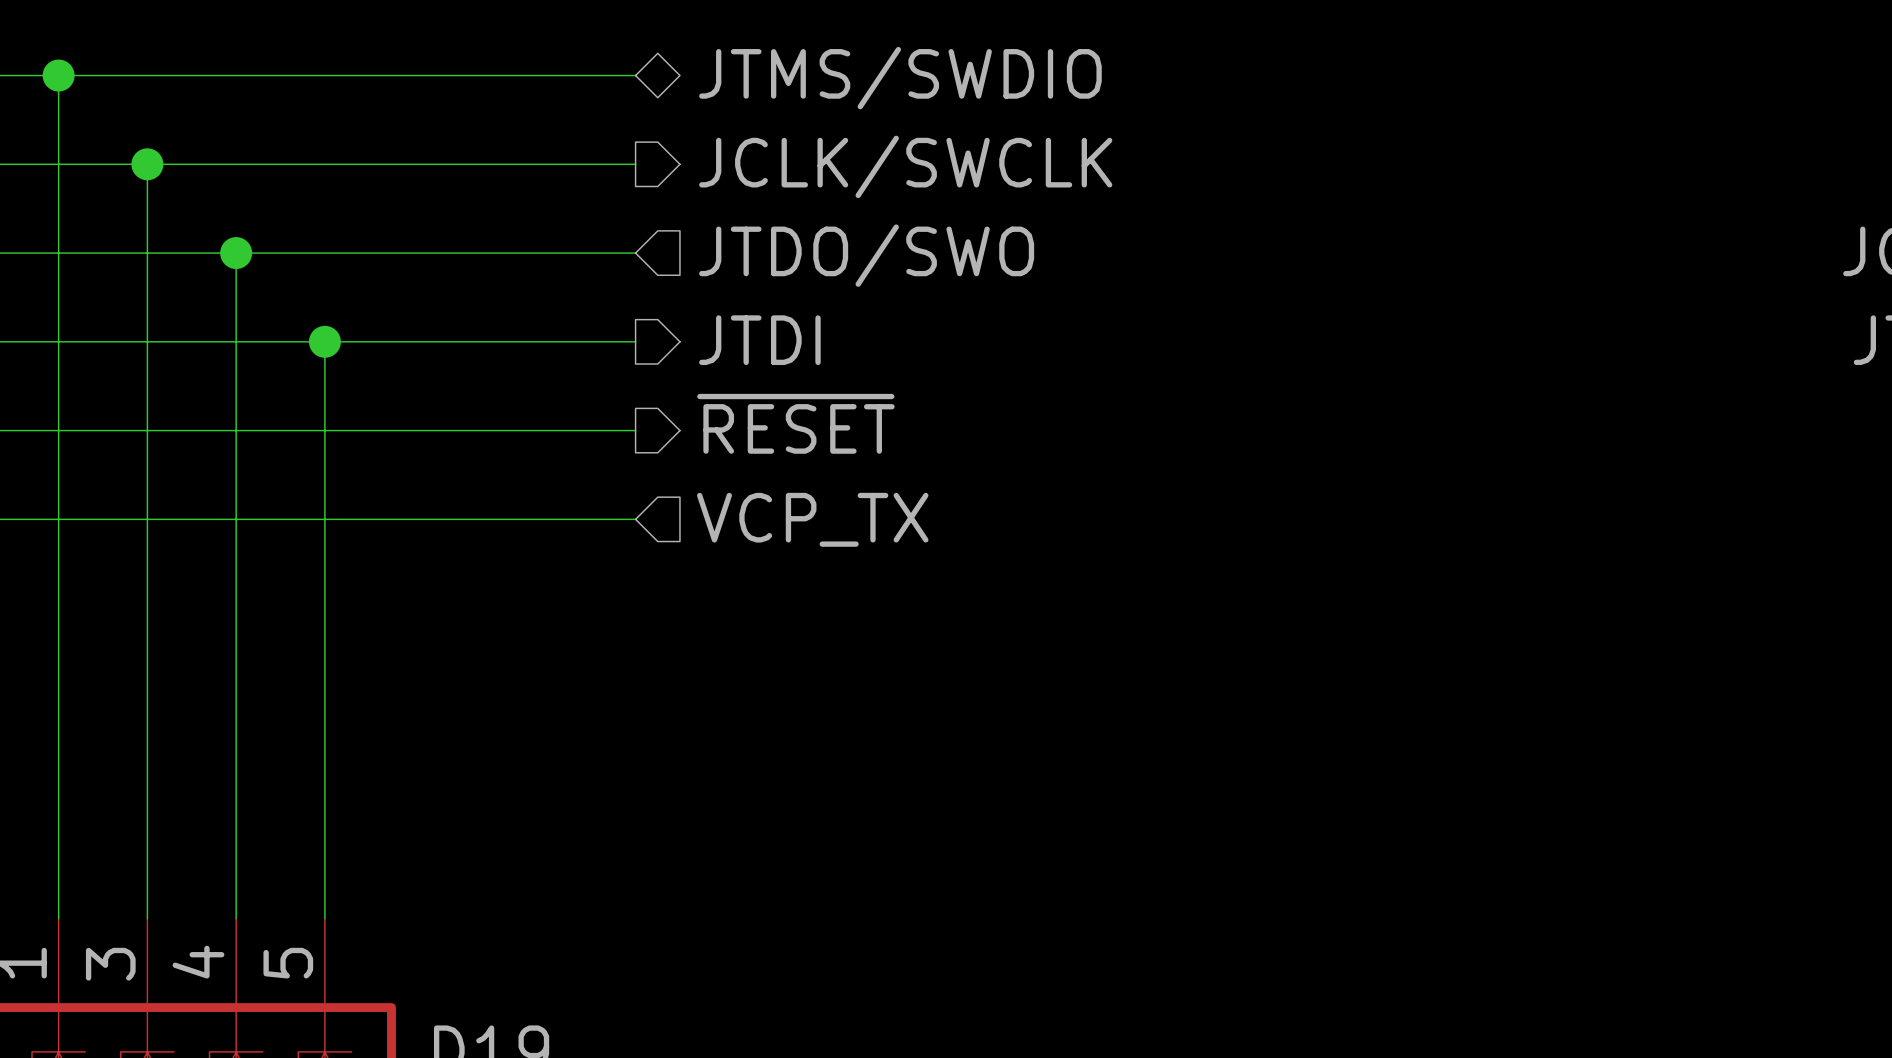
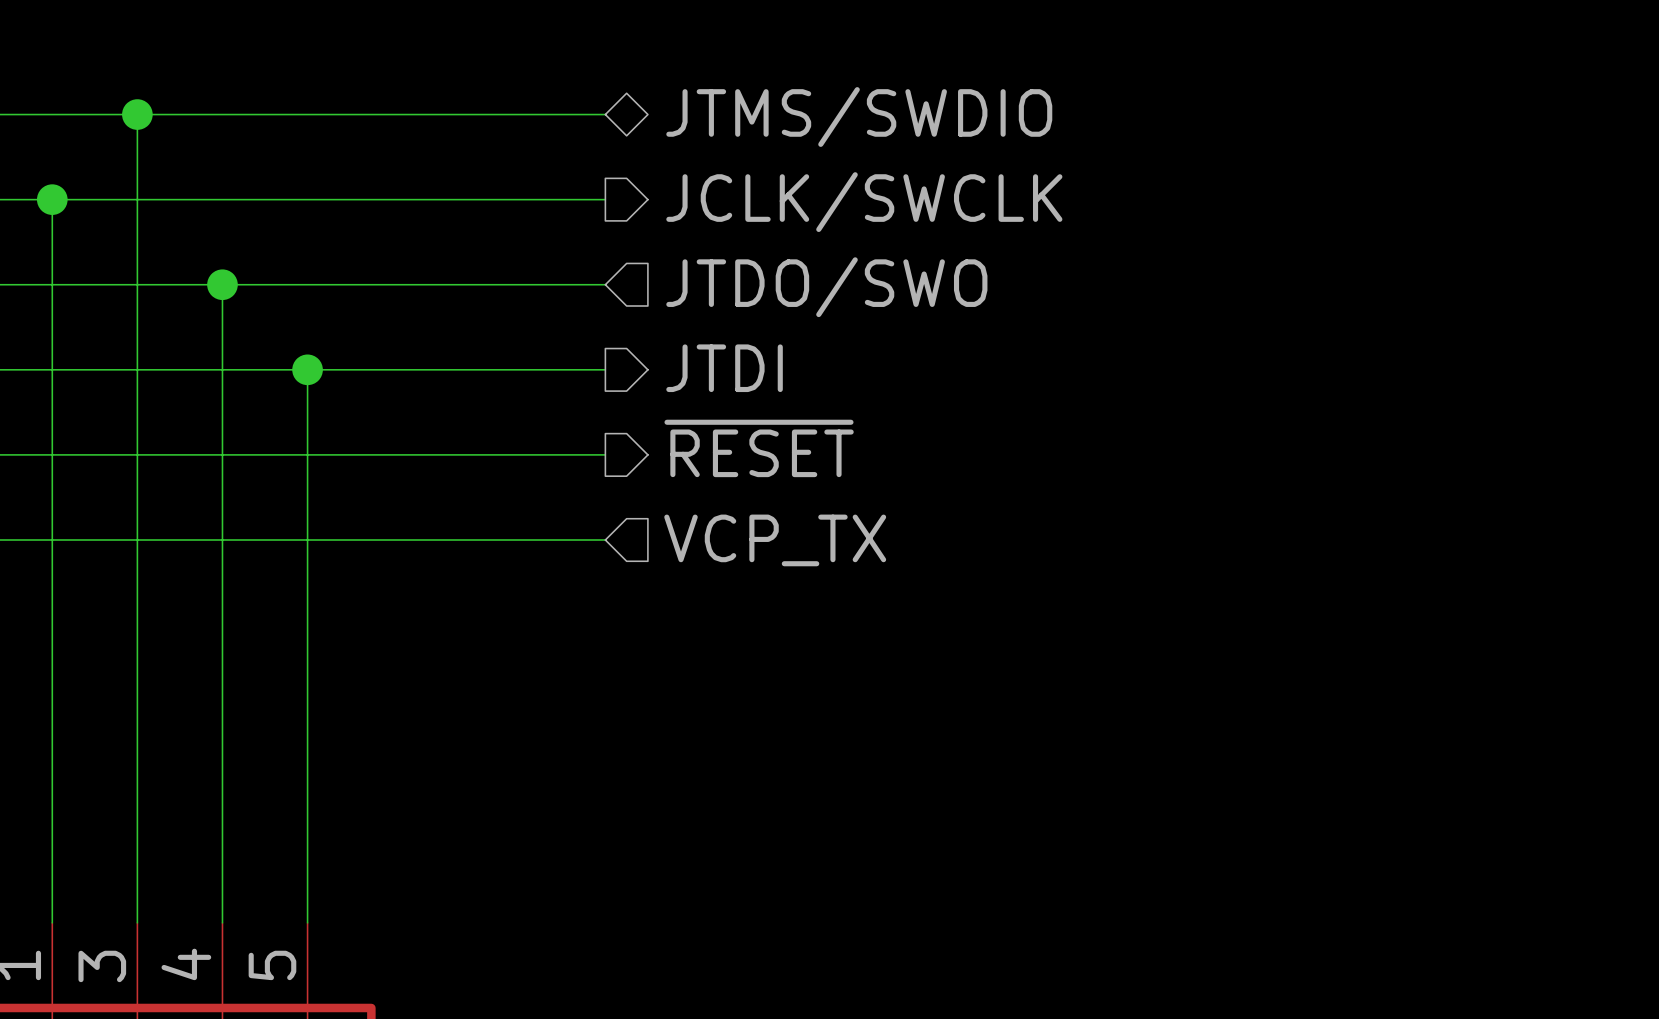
wire: (58, 75) (58, 164) -> (137, 114) (137, 199)
junction: (58, 75) -> none
junction: none -> (137, 114)
junction: none -> (52, 199)
junction: (147, 164) -> none

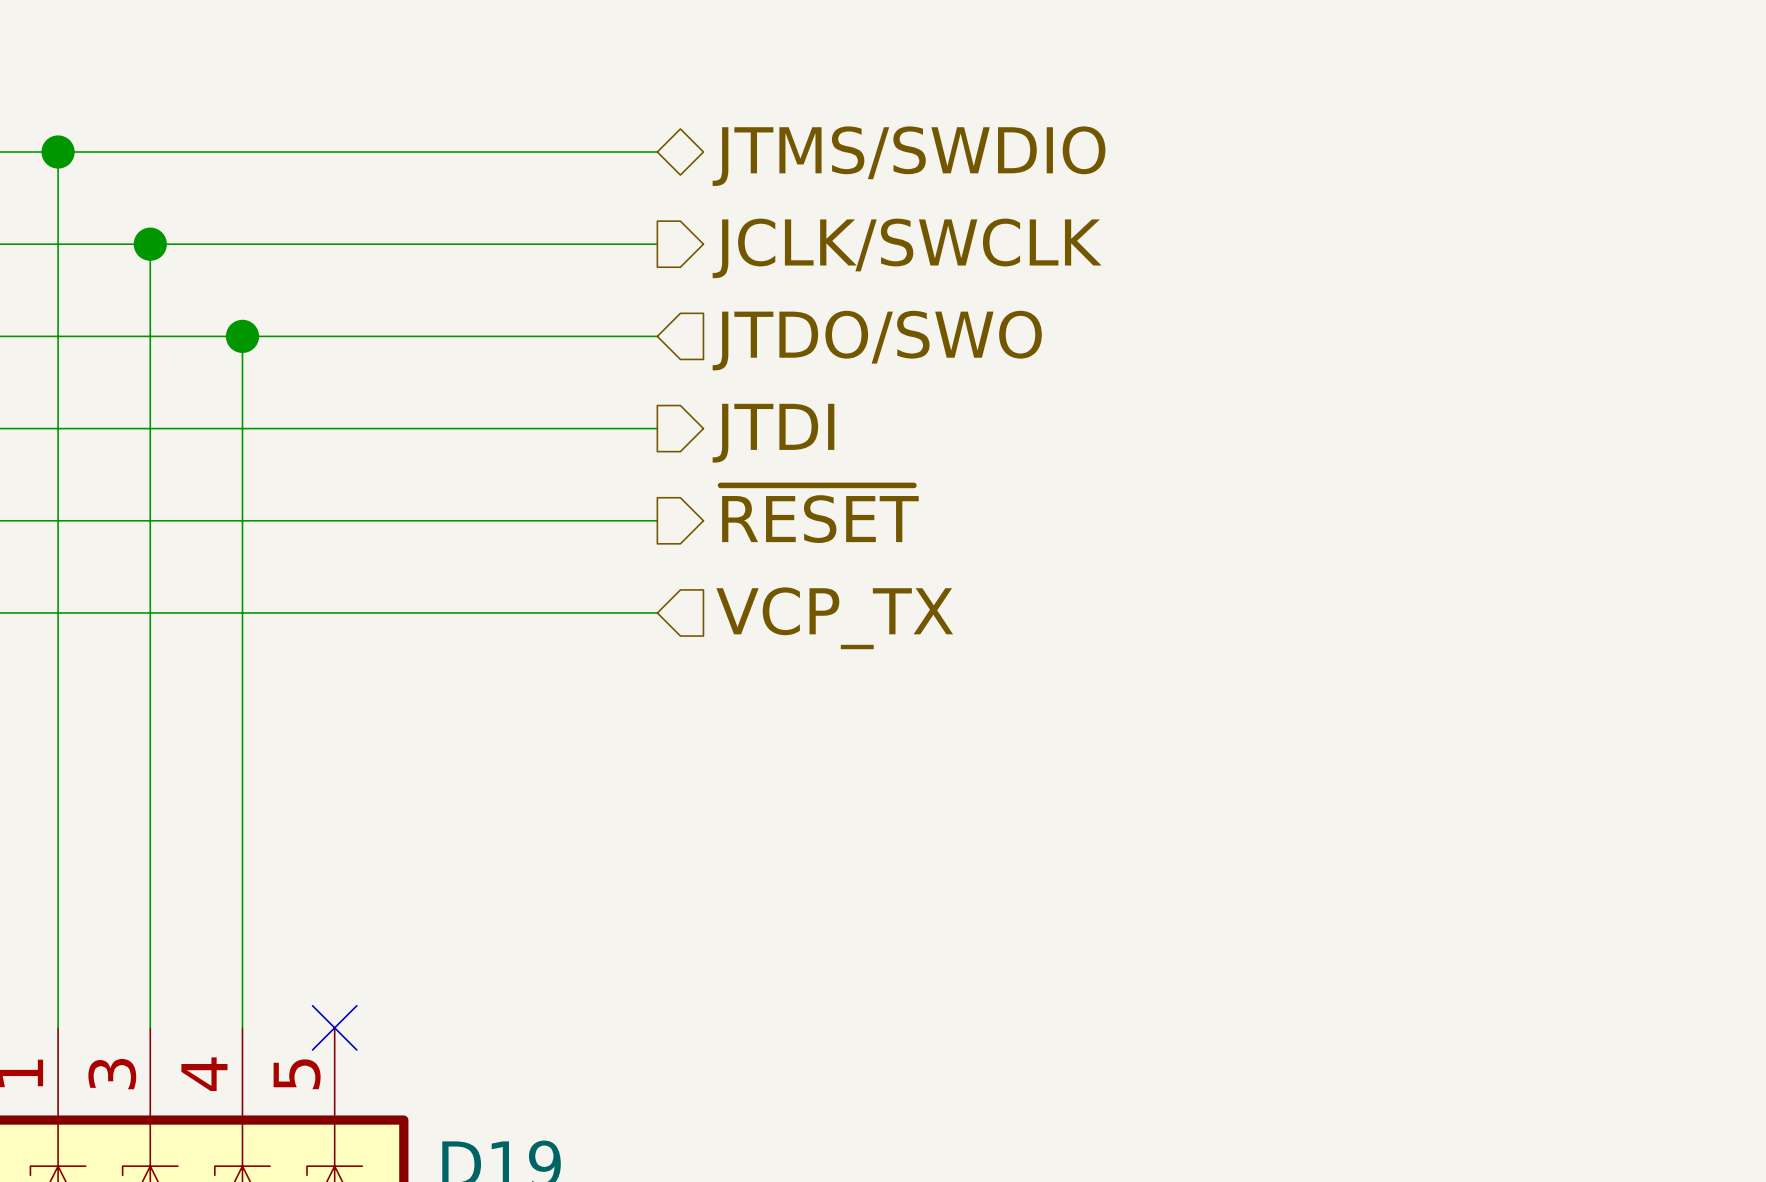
junction: none -> (58, 151)
wire: (137, 114) (137, 199) -> (58, 151) (58, 244)
junction: (137, 114) -> none
junction: (52, 199) -> none
junction: none -> (150, 244)
wire: (307, 369) (307, 922) -> none
junction: (307, 369) -> none
no-connect mark: none -> (334, 1027)

